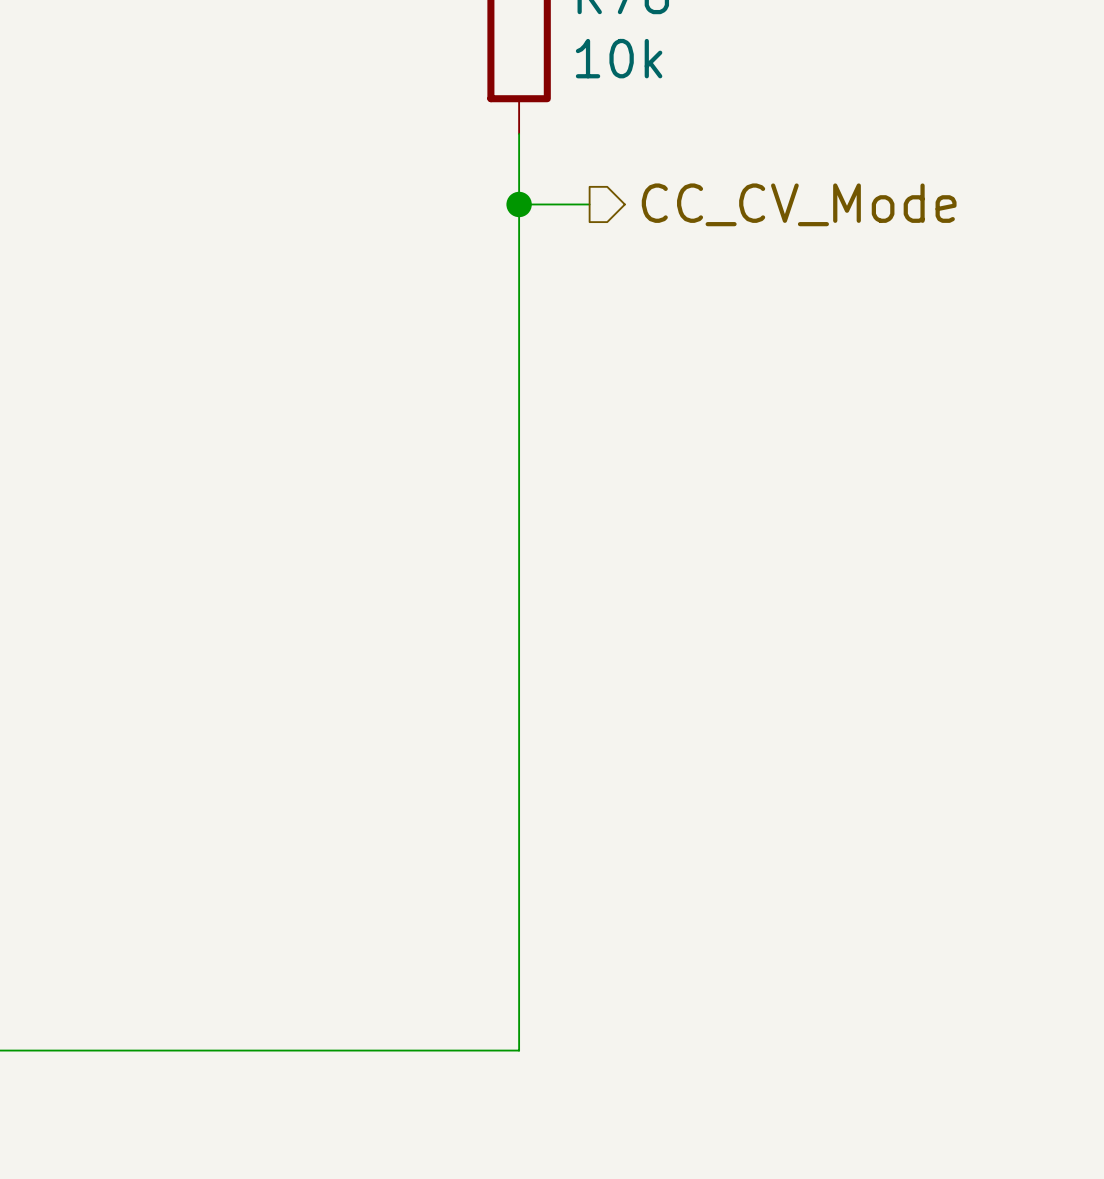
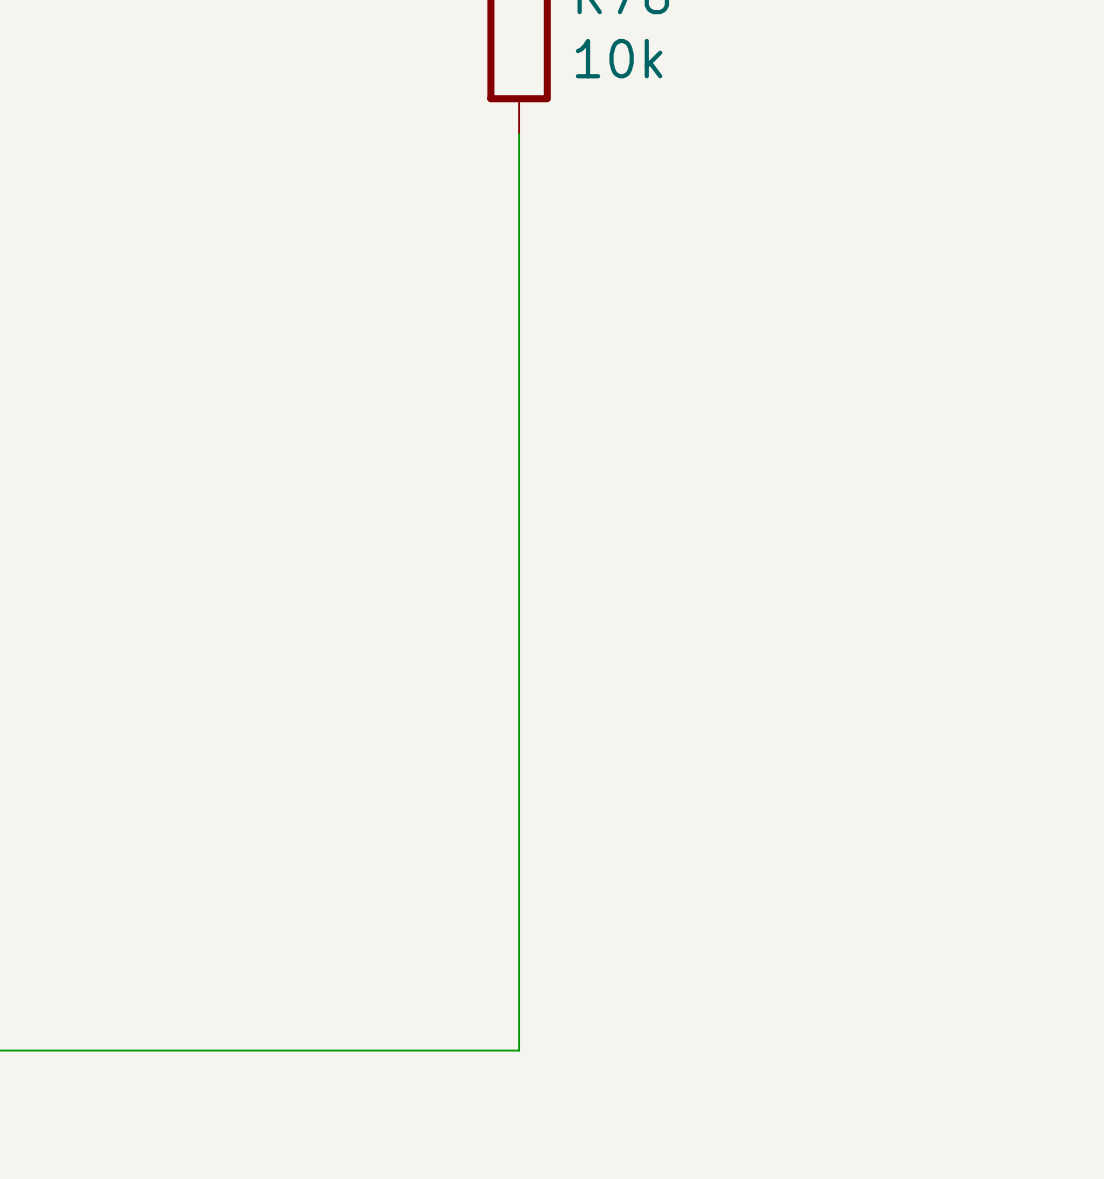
wire: (519, 204) (589, 204) -> none
junction: (519, 204) -> none
hierarchical label: CC_CV_Mode (799, 204) -> none

